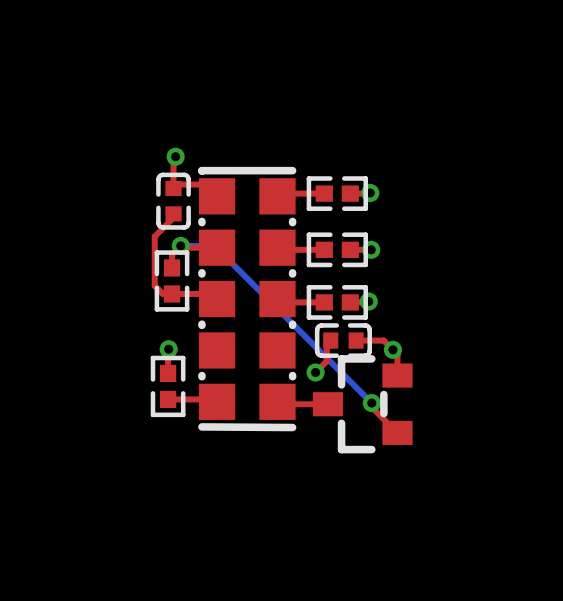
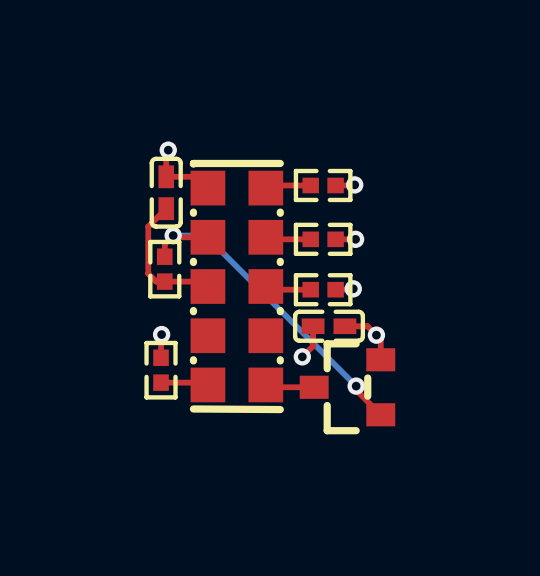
part footprint: [156, 172, 191, 230] -> [149, 156, 183, 229]
part footprint: [314, 323, 372, 358] -> [292, 309, 366, 343]

